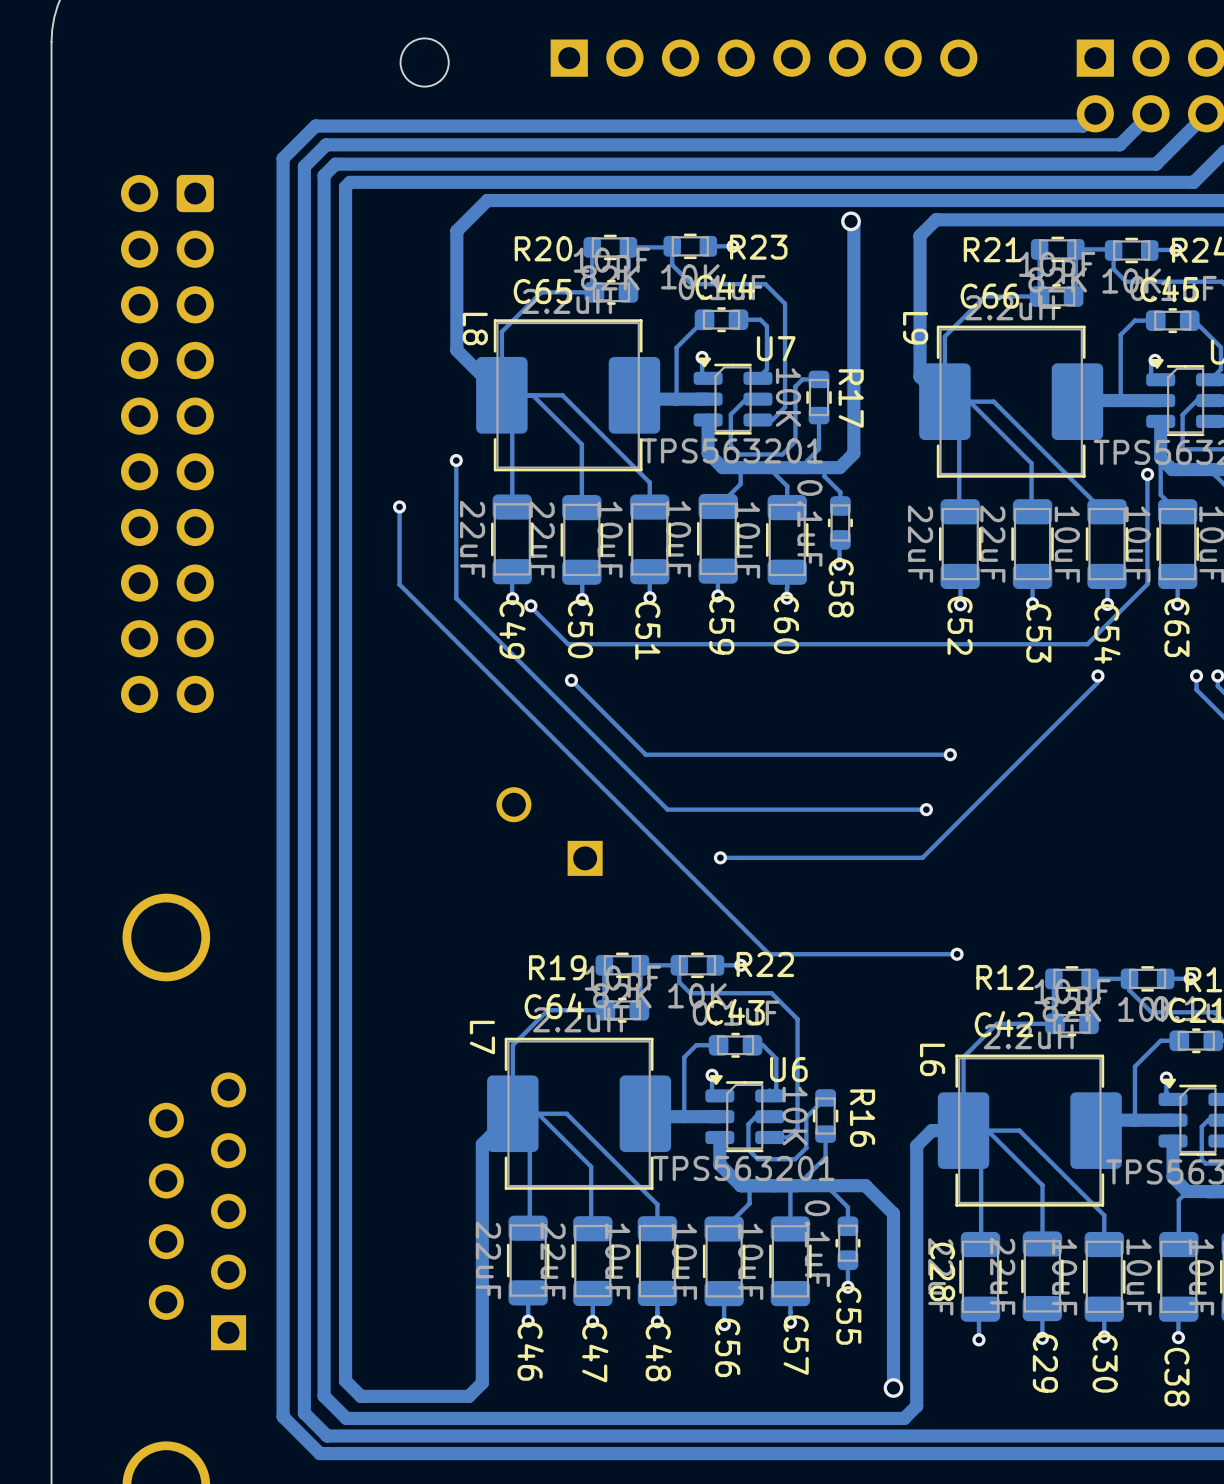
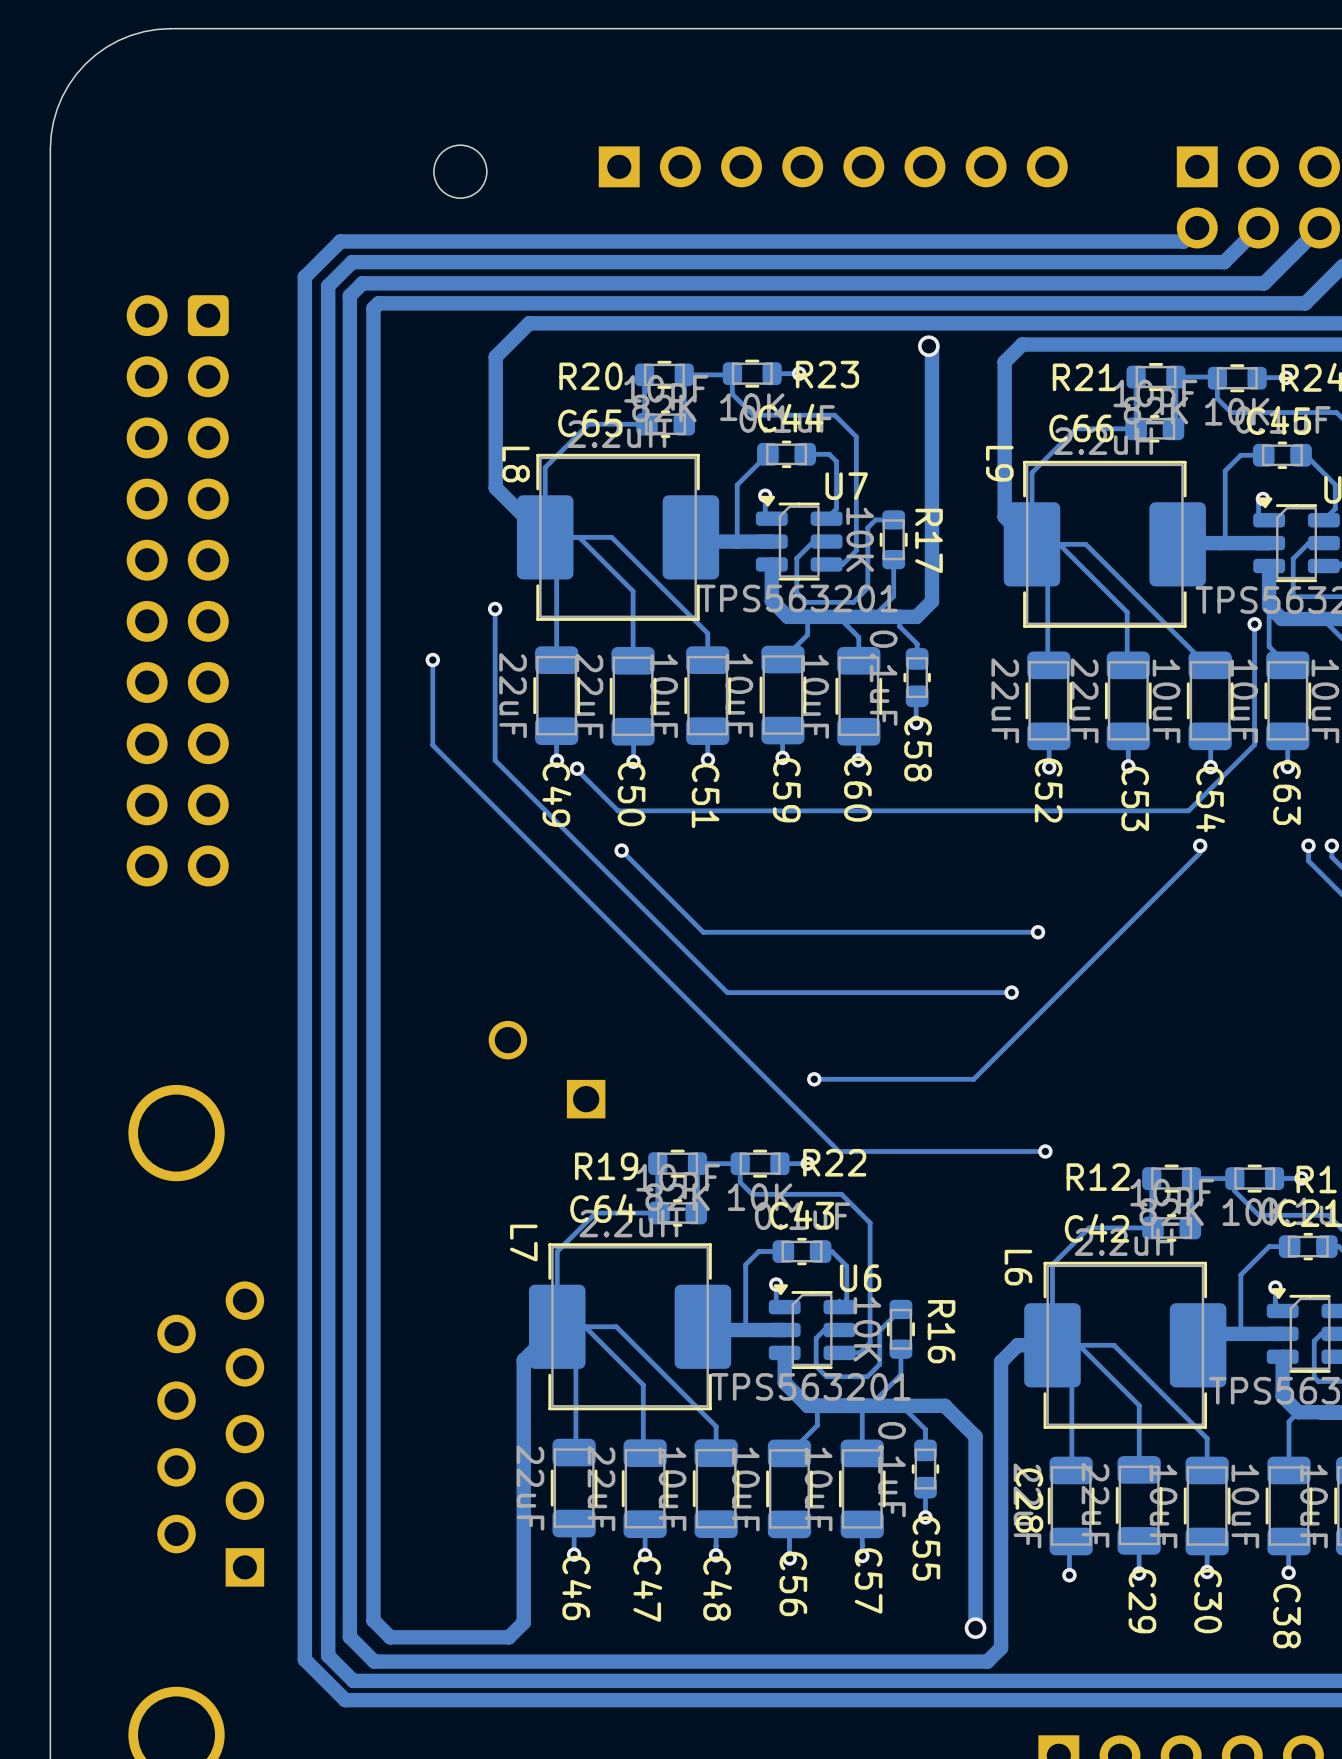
part position: (549, 831) -> (547, 1069)
via position: (720, 857) -> (814, 1079)
track: (922, 857) (720, 857) -> (1007, 1045) (973, 1079) (814, 1079)

